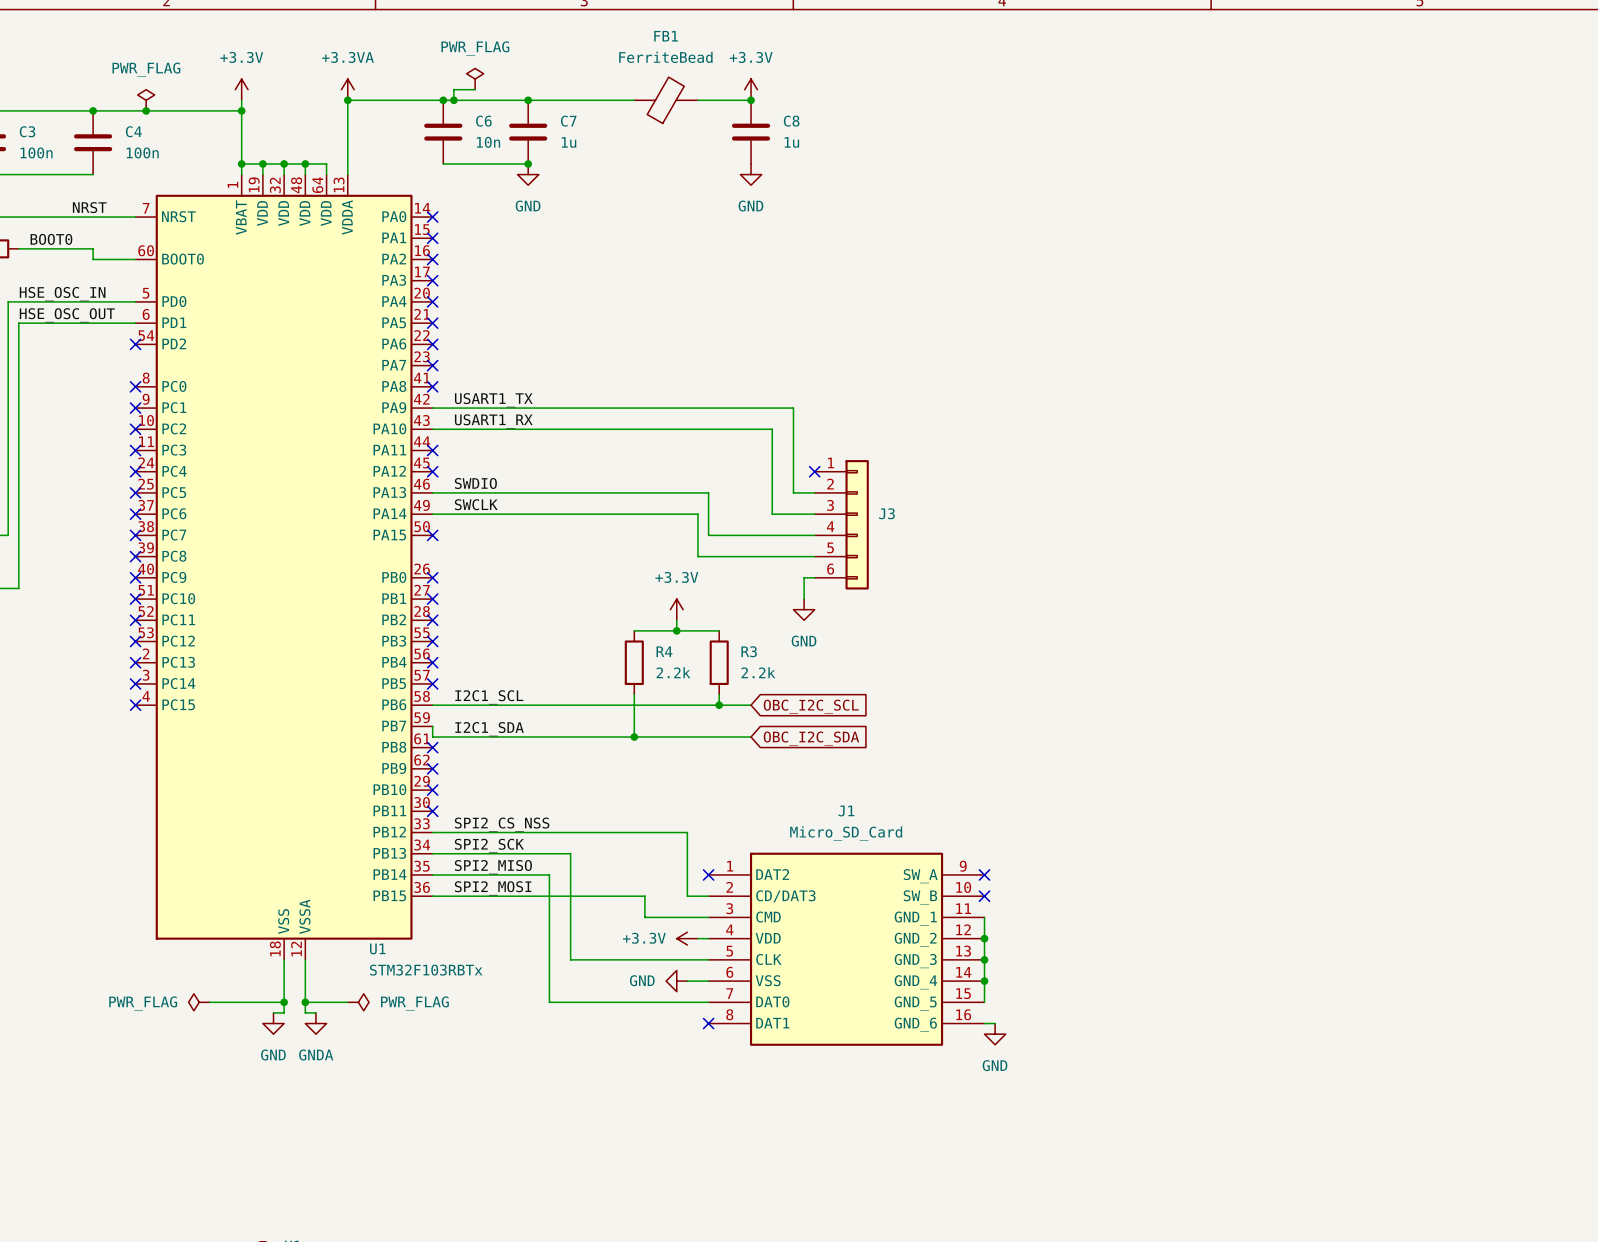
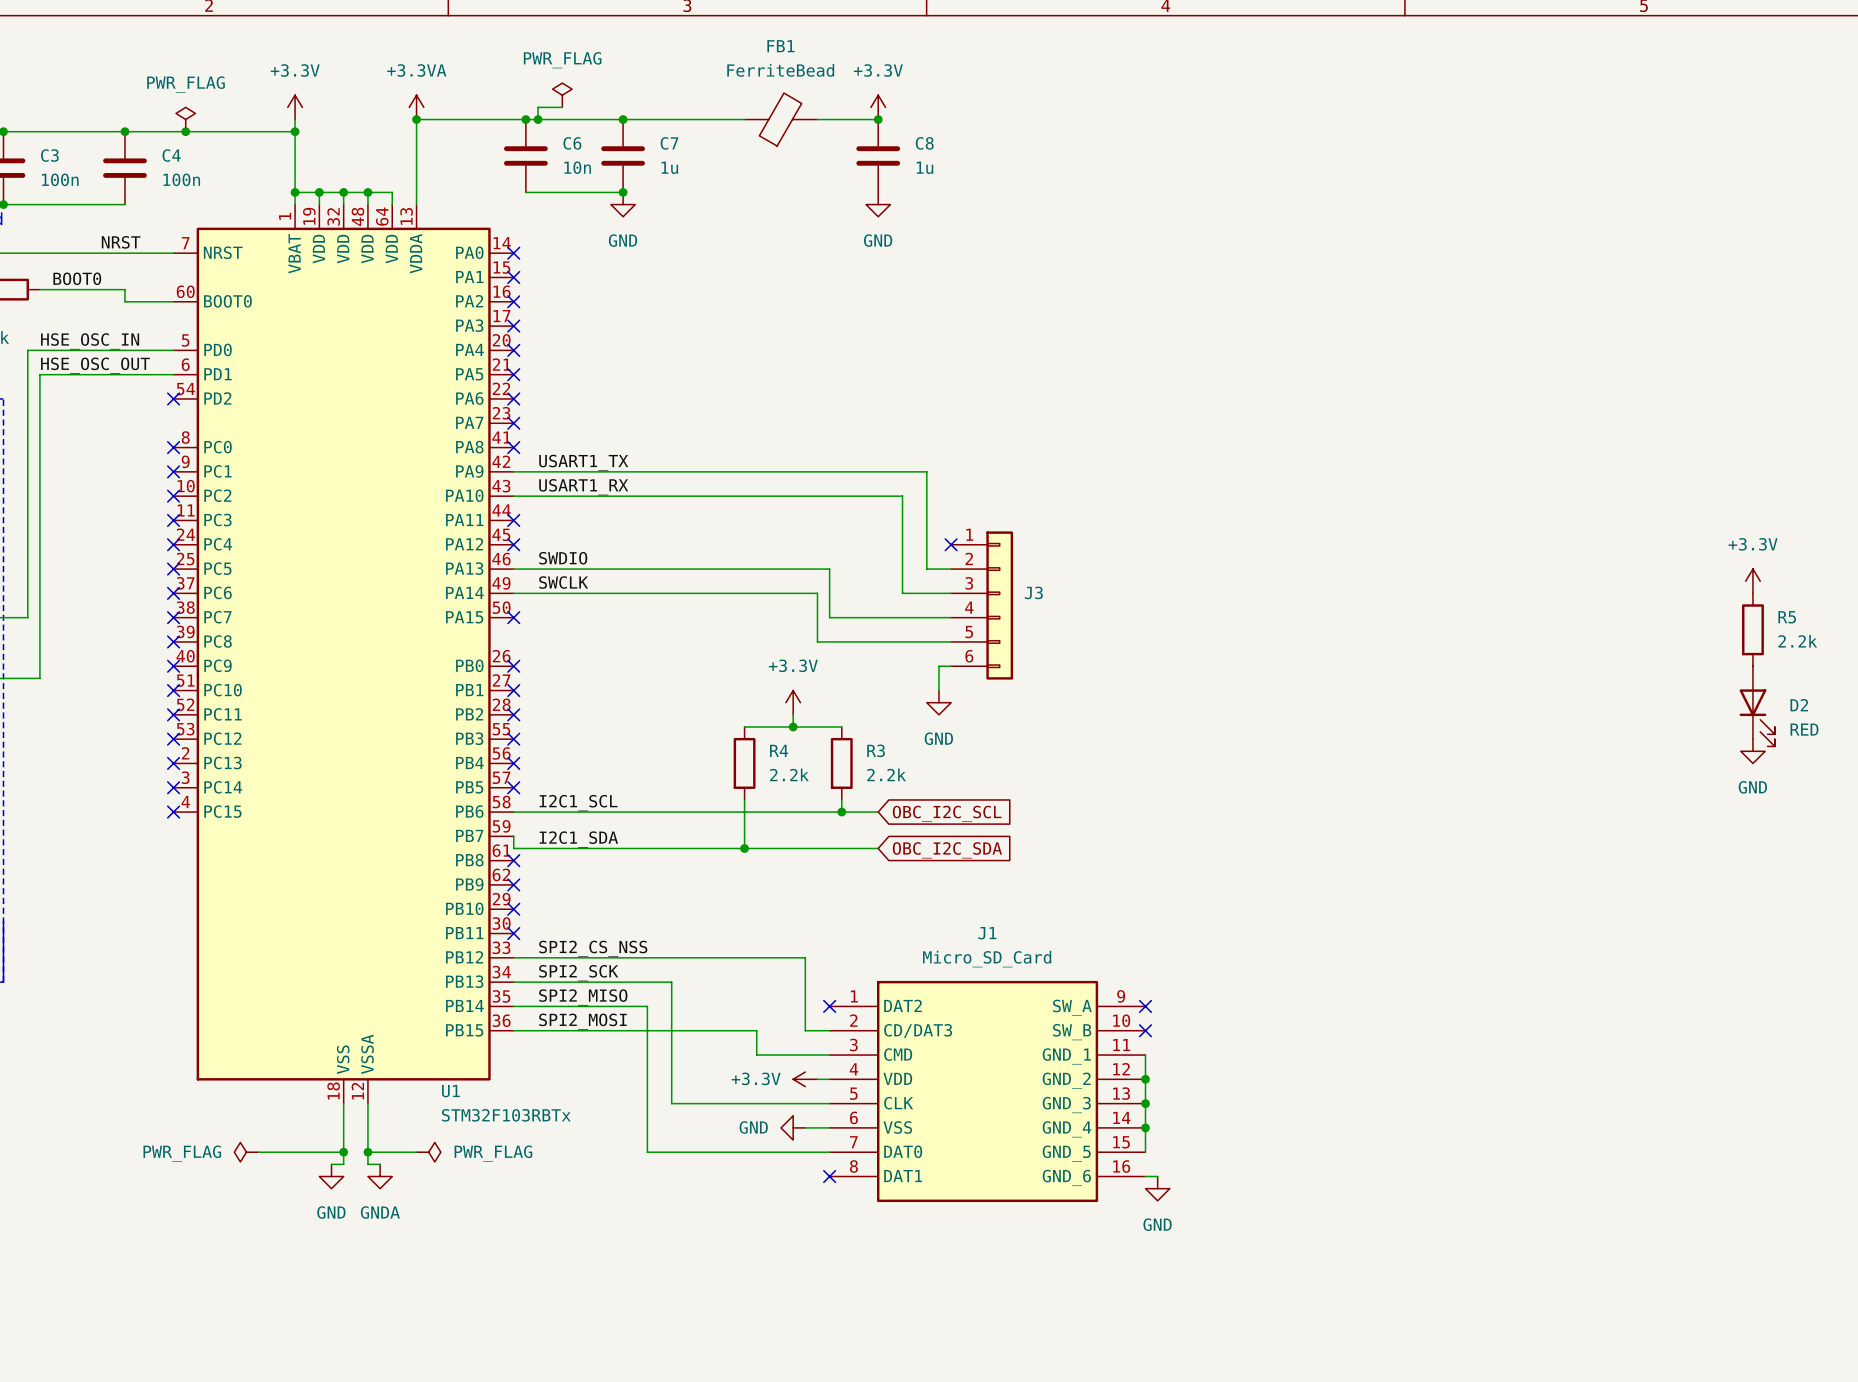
power symbol: none -> +3.3V (1752, 581)
R5: none -> 2.2k (1752, 629)
D2: none -> RED (1757, 706)
power symbol: none -> GND (1752, 751)

